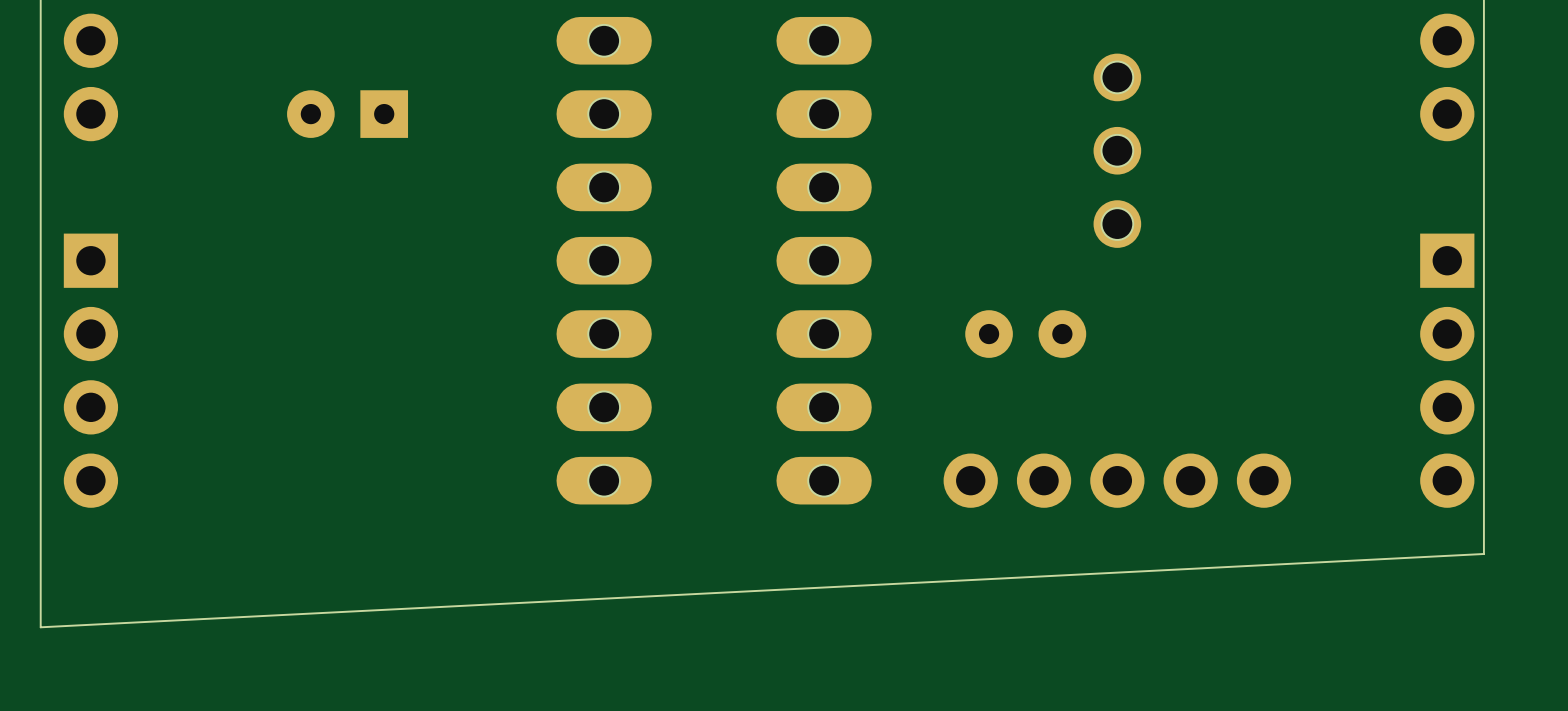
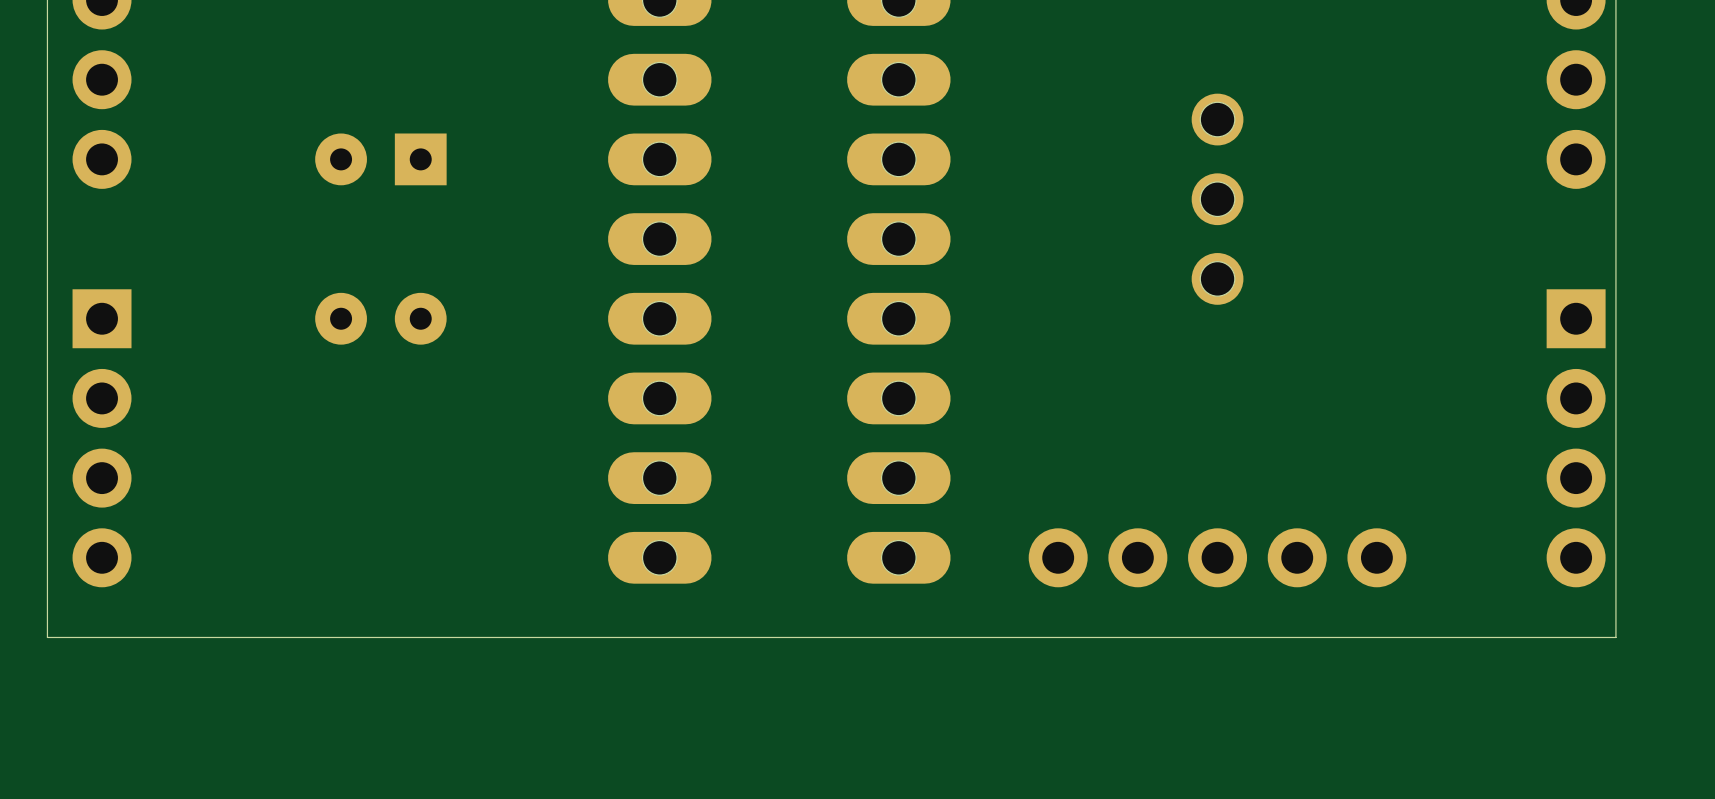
part position: (1025, 334) -> (380, 318)
board edge: (1483, 553) (40, 627) (40, 553) -> (1615, 637) (47, 637)

